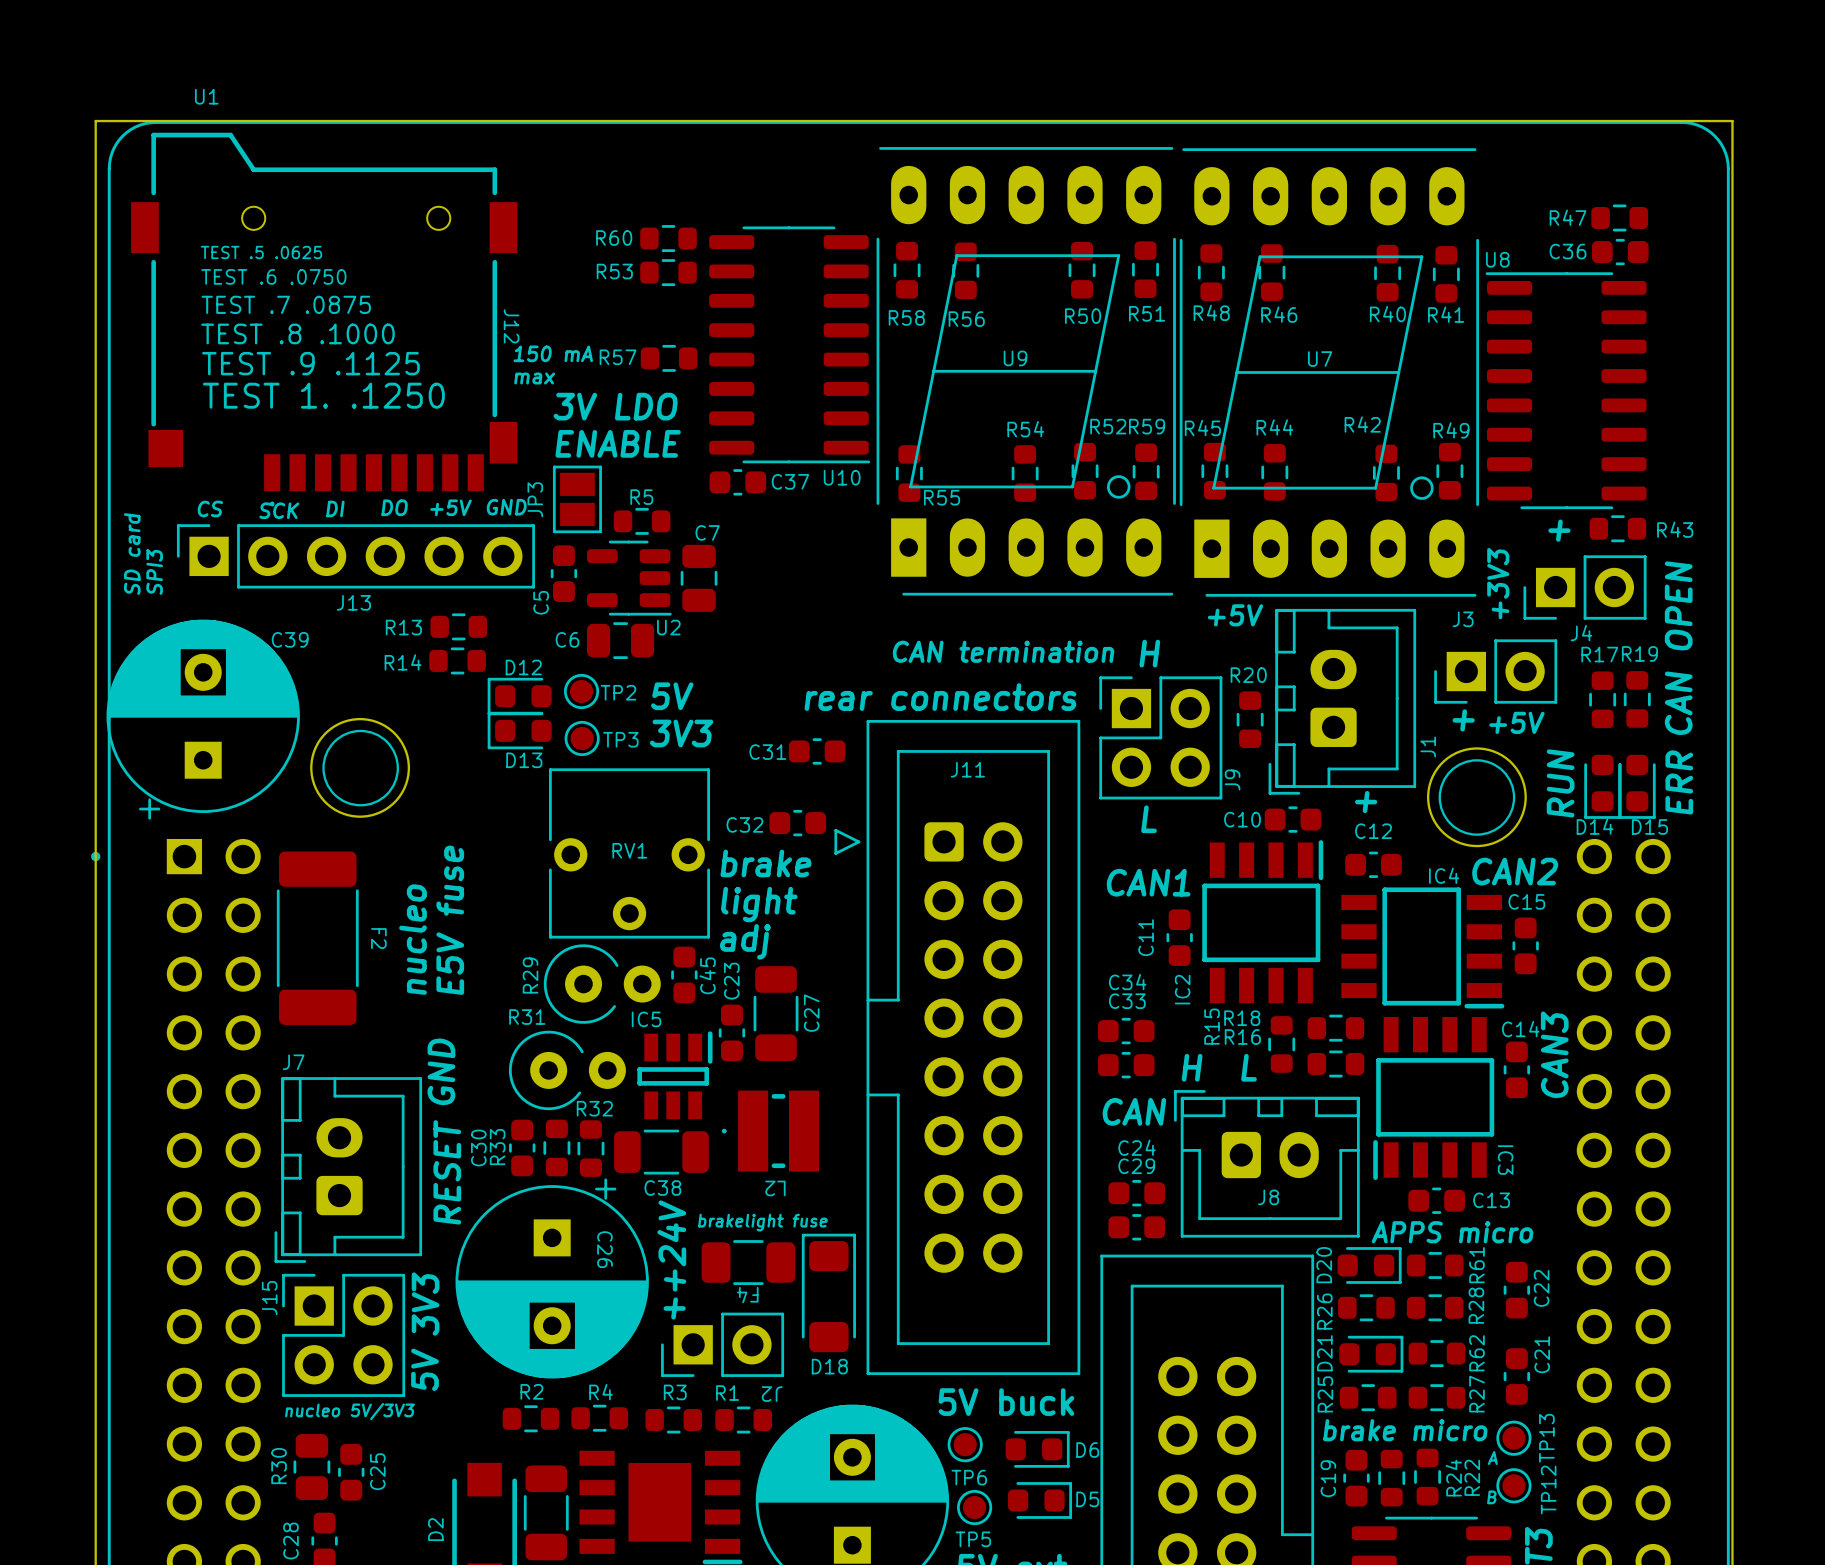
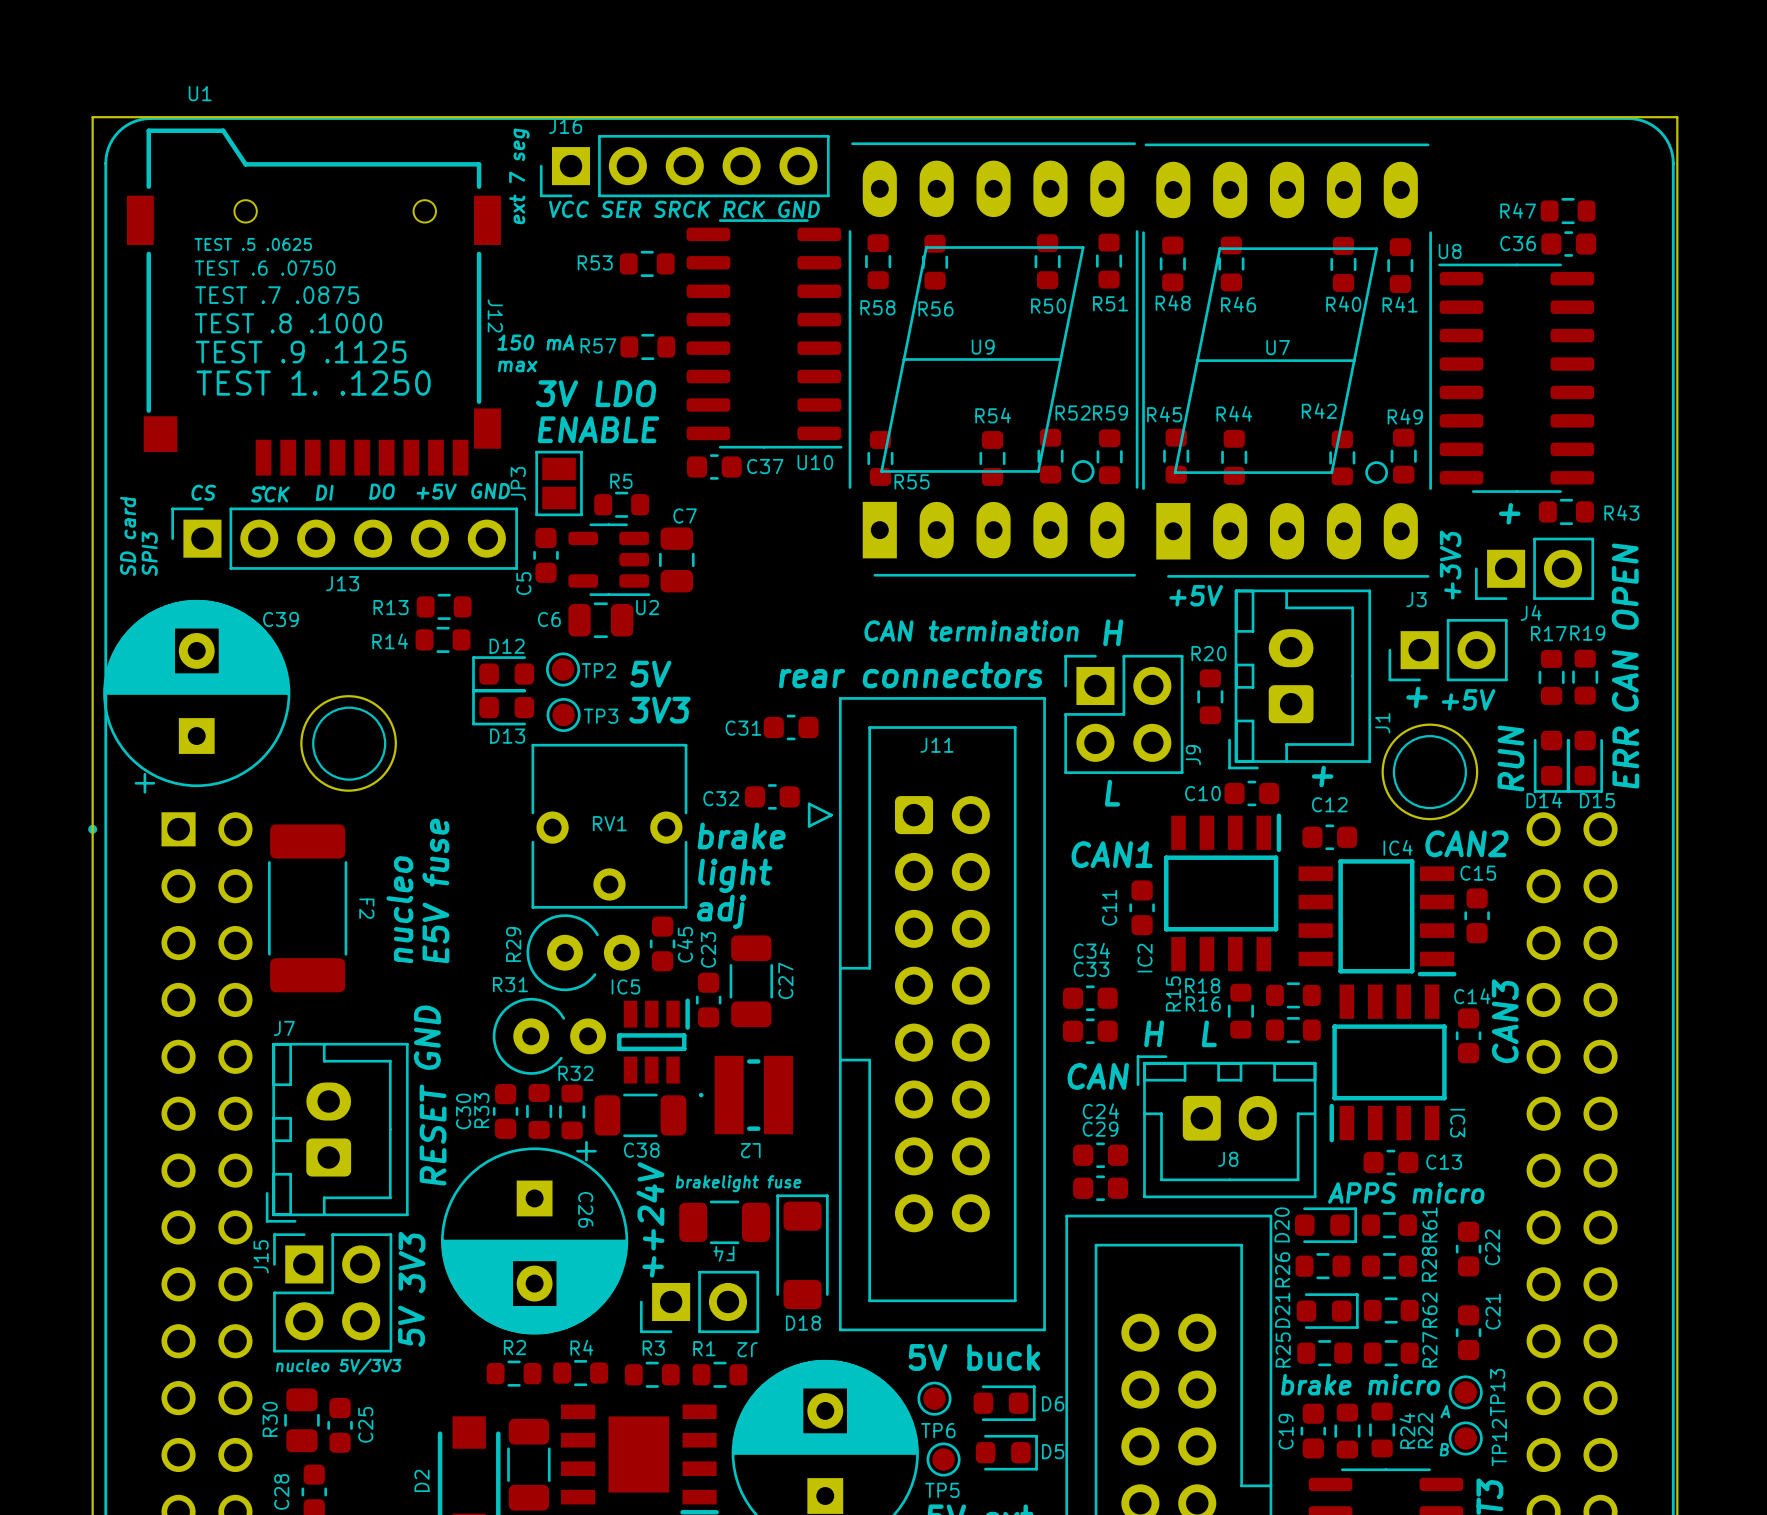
J16: none -> (684, 166)
text: none -> ext 7 seg (519, 176)
text: none -> VCC SER SRCK RCK GND (684, 209)
R60: (668, 238) -> none

